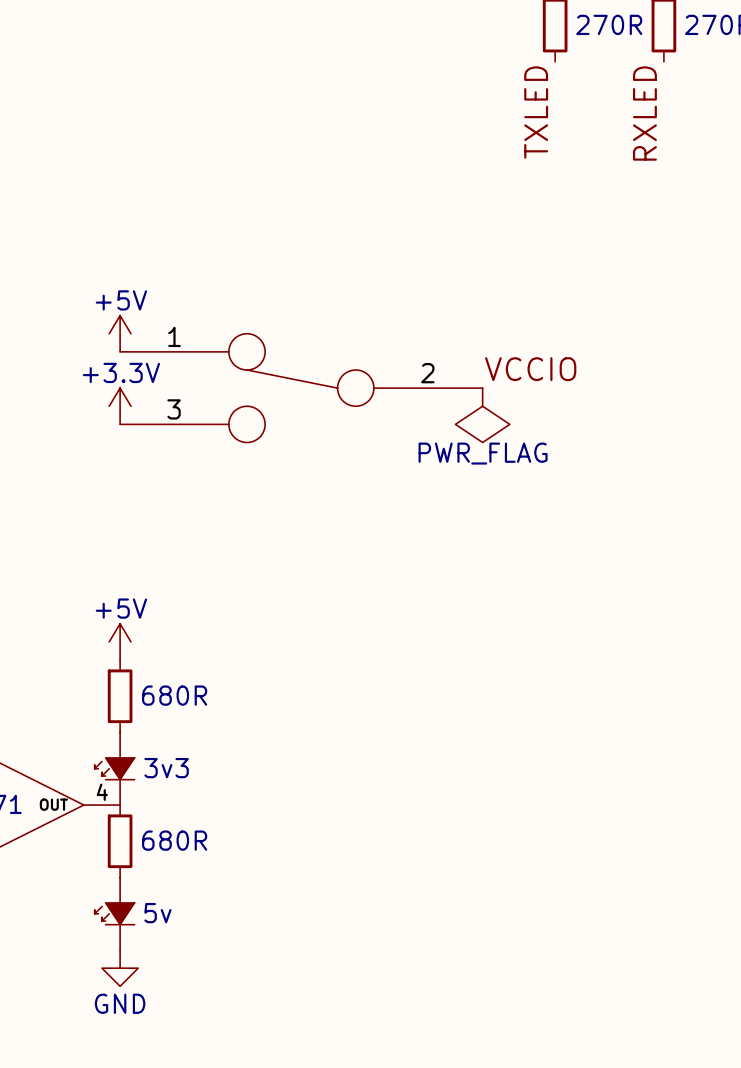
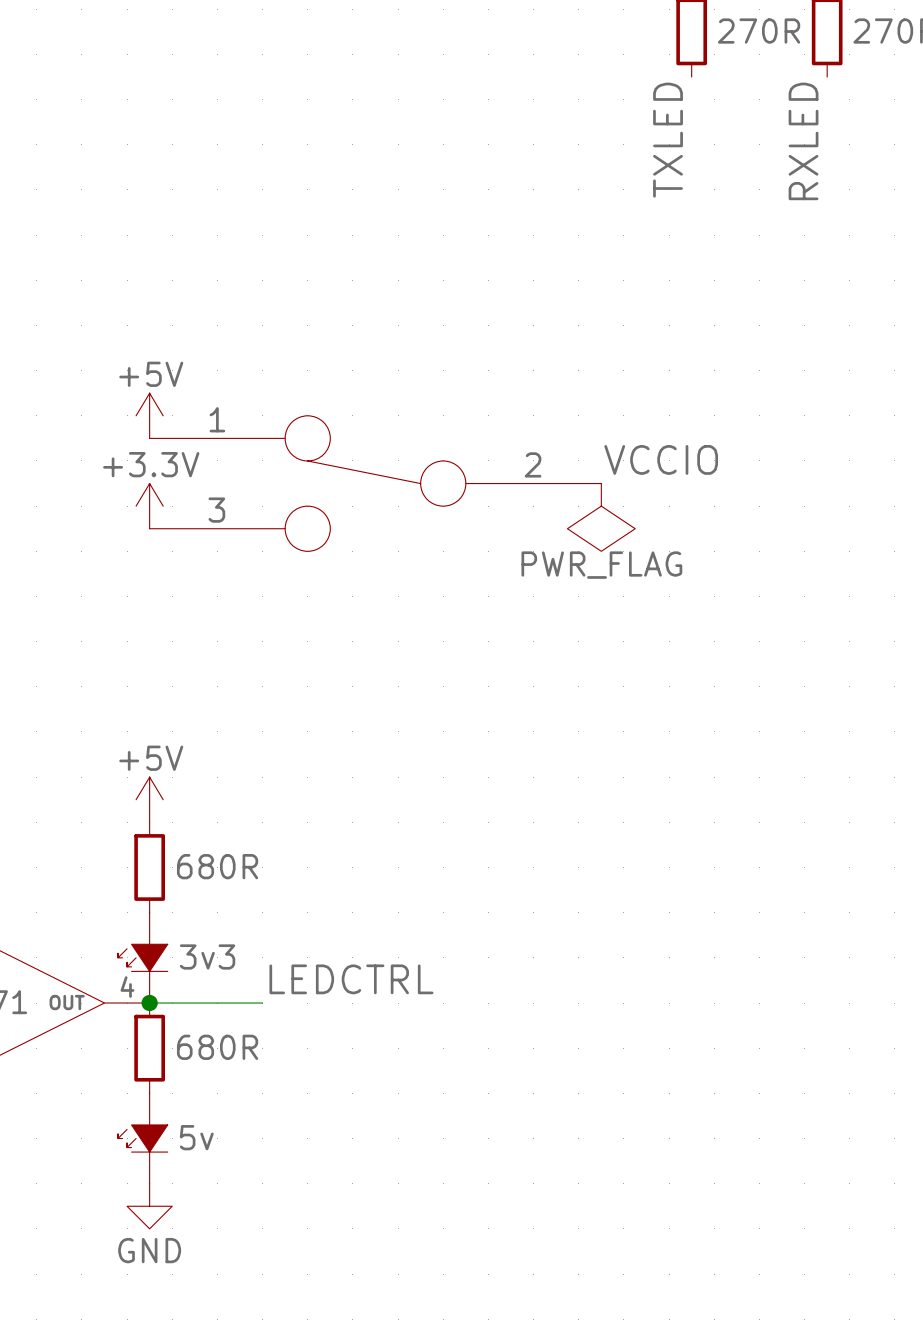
label: none -> LEDCTRL (351, 979)
wire: none -> (149, 1003) (262, 1003)
junction: none -> (149, 1003)

